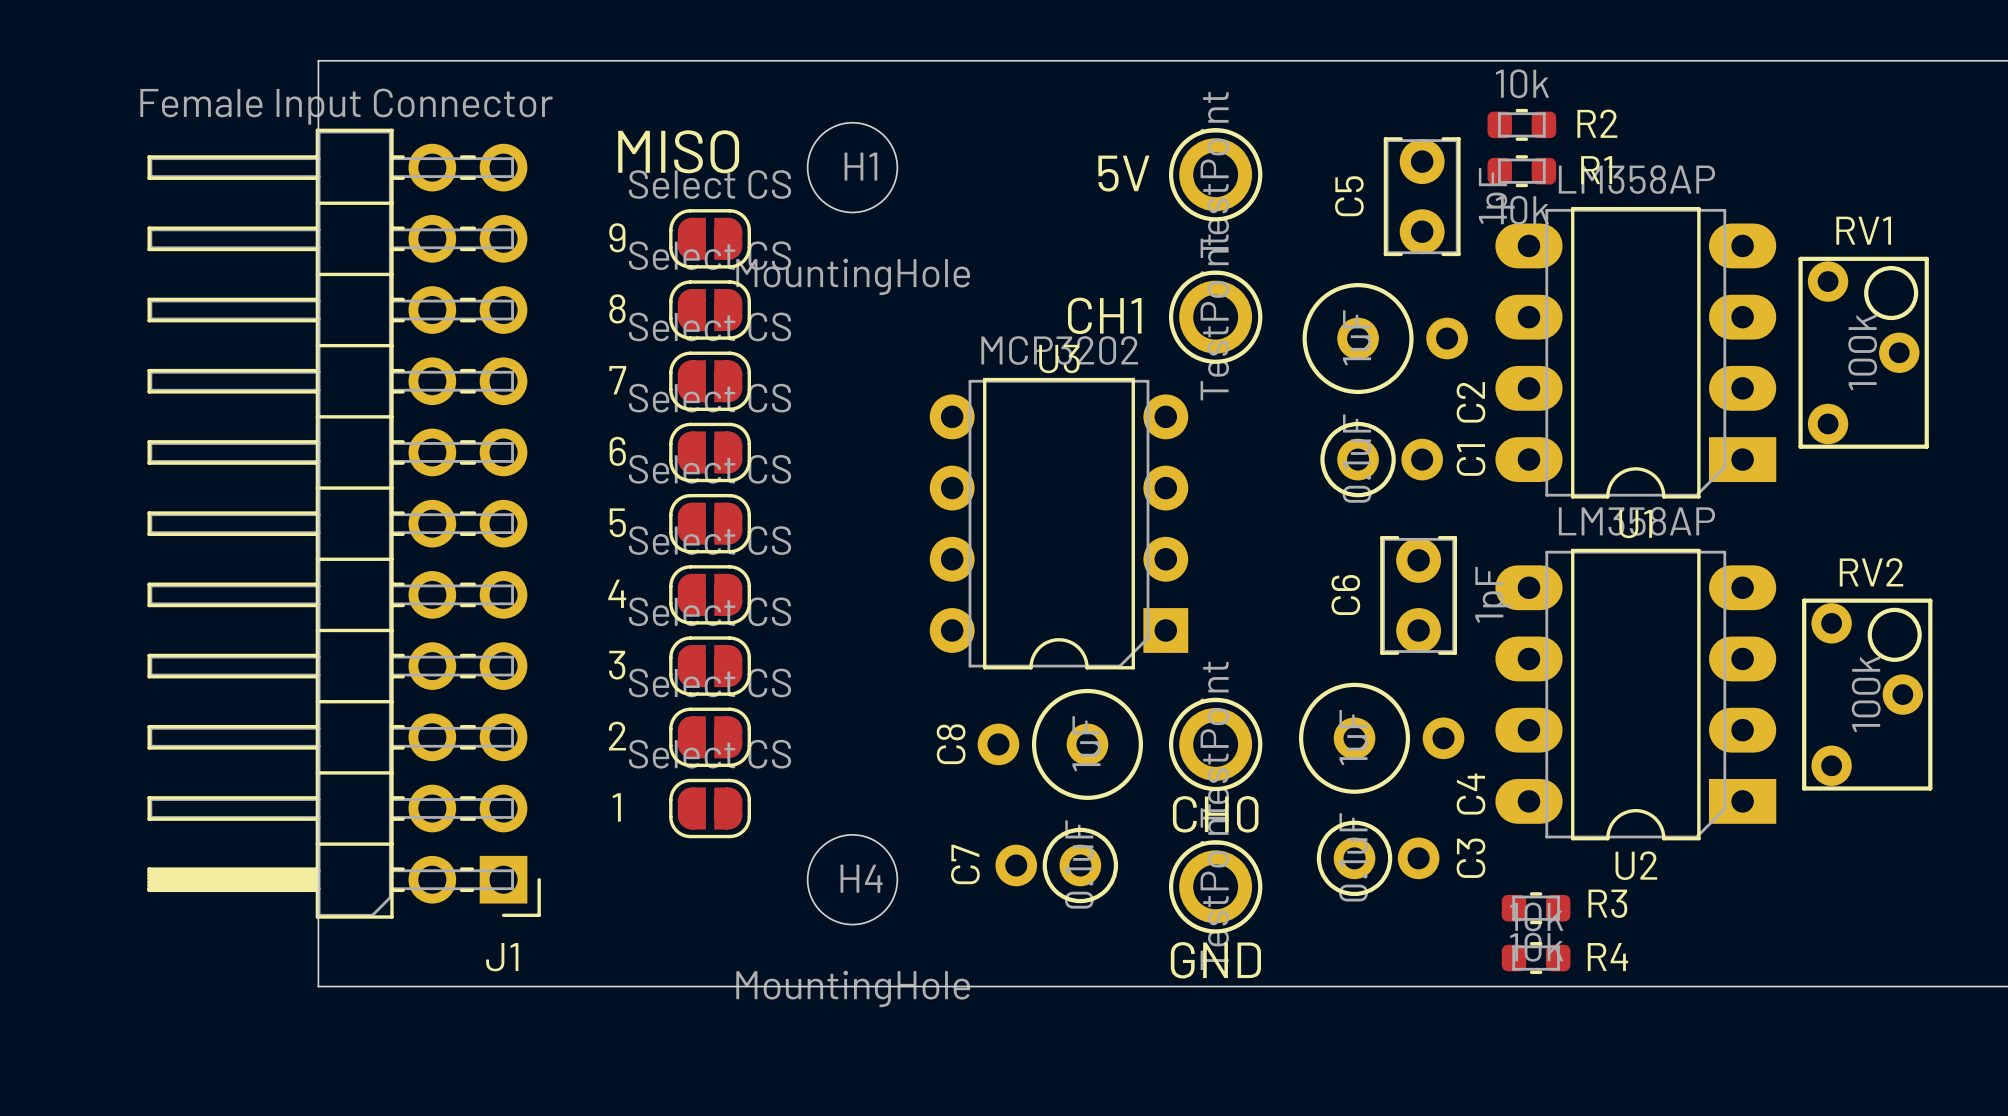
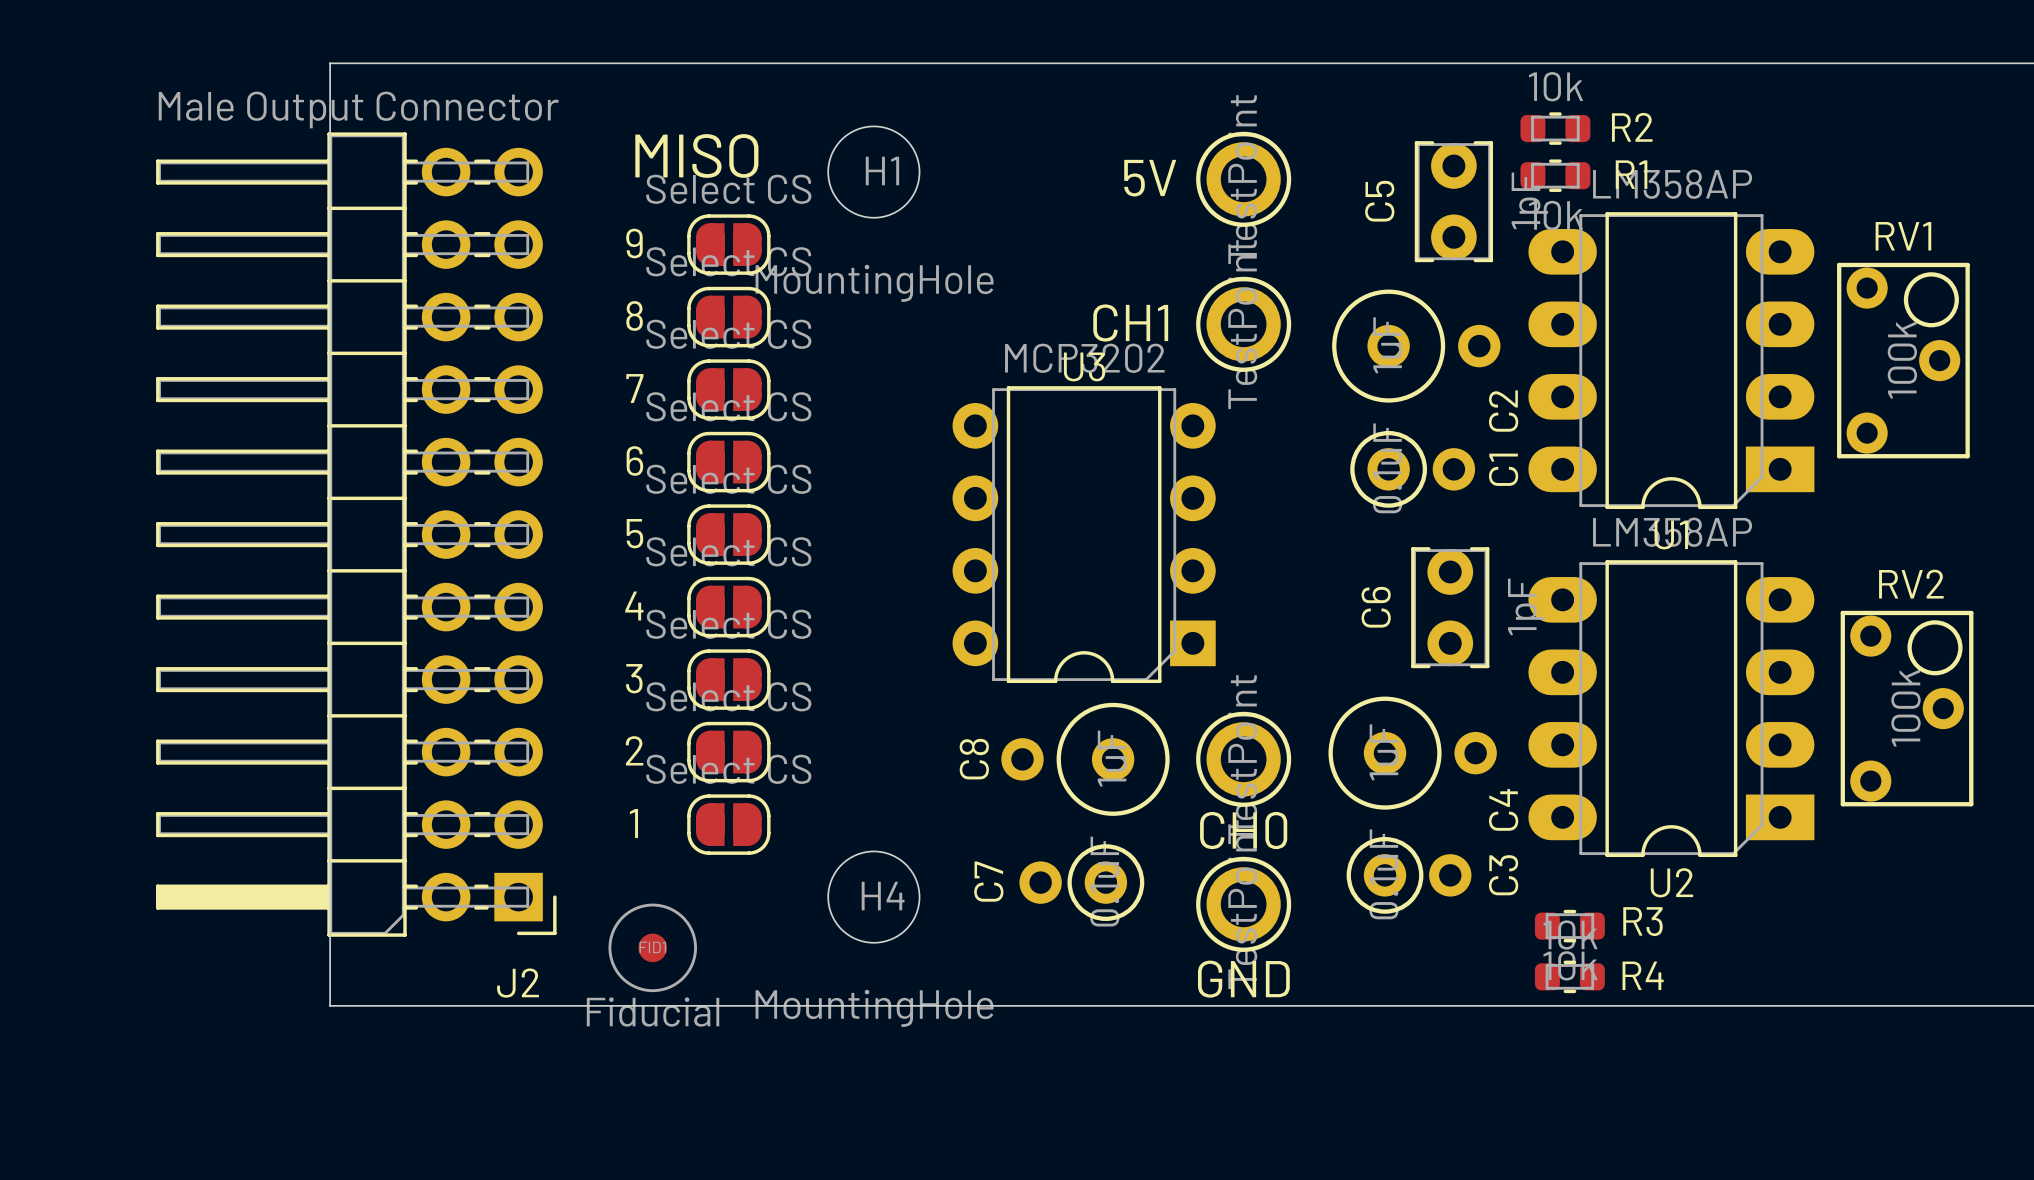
J1 value: Female Input Connector (346, 106) -> Male Output Connector (358, 110)
FID1: none -> Fiducial (652, 947)
J1 name: J1 (502, 957) -> J2 (518, 983)

